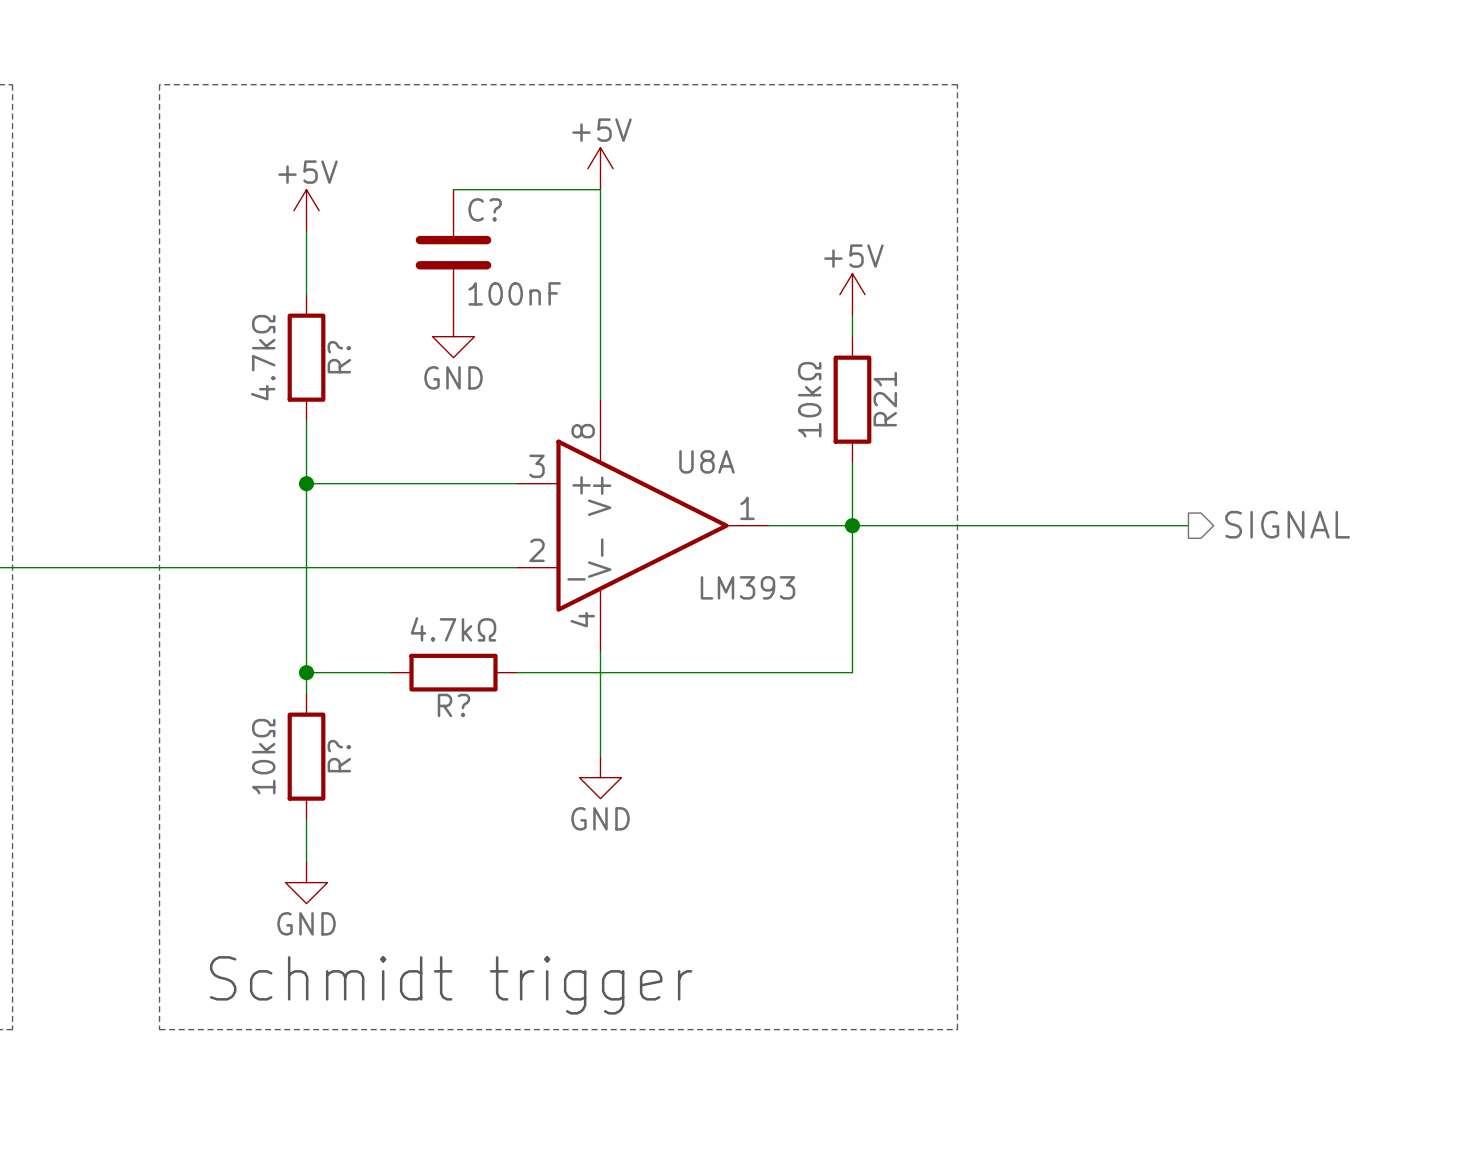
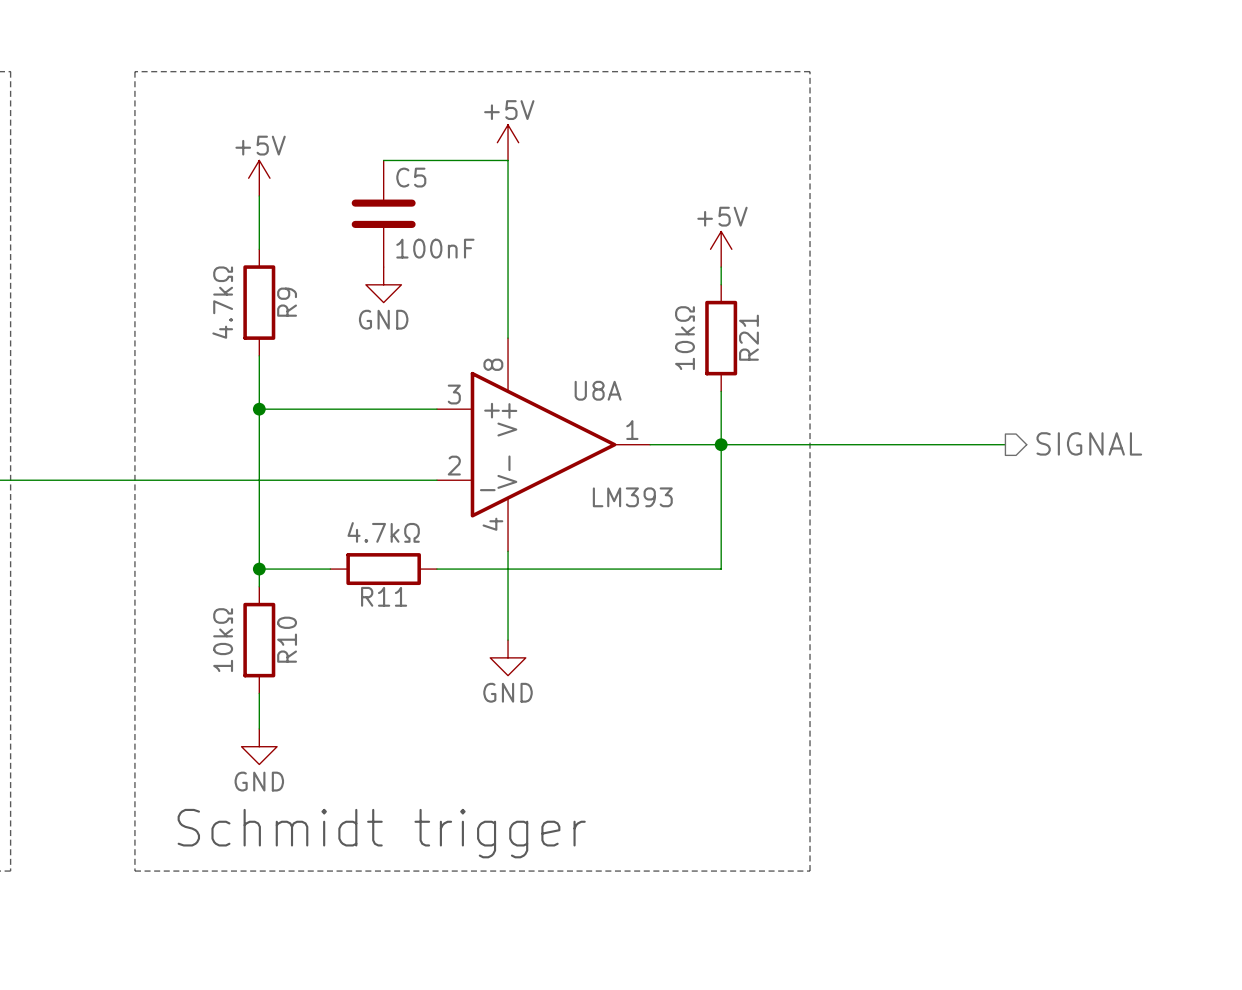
C? name: C? (485, 209) -> C5 (411, 177)
R? name: R? (339, 357) -> R9 (287, 302)
R? name: R? (454, 705) -> R11 (384, 596)
R? name: R? (339, 756) -> R10 (287, 639)

